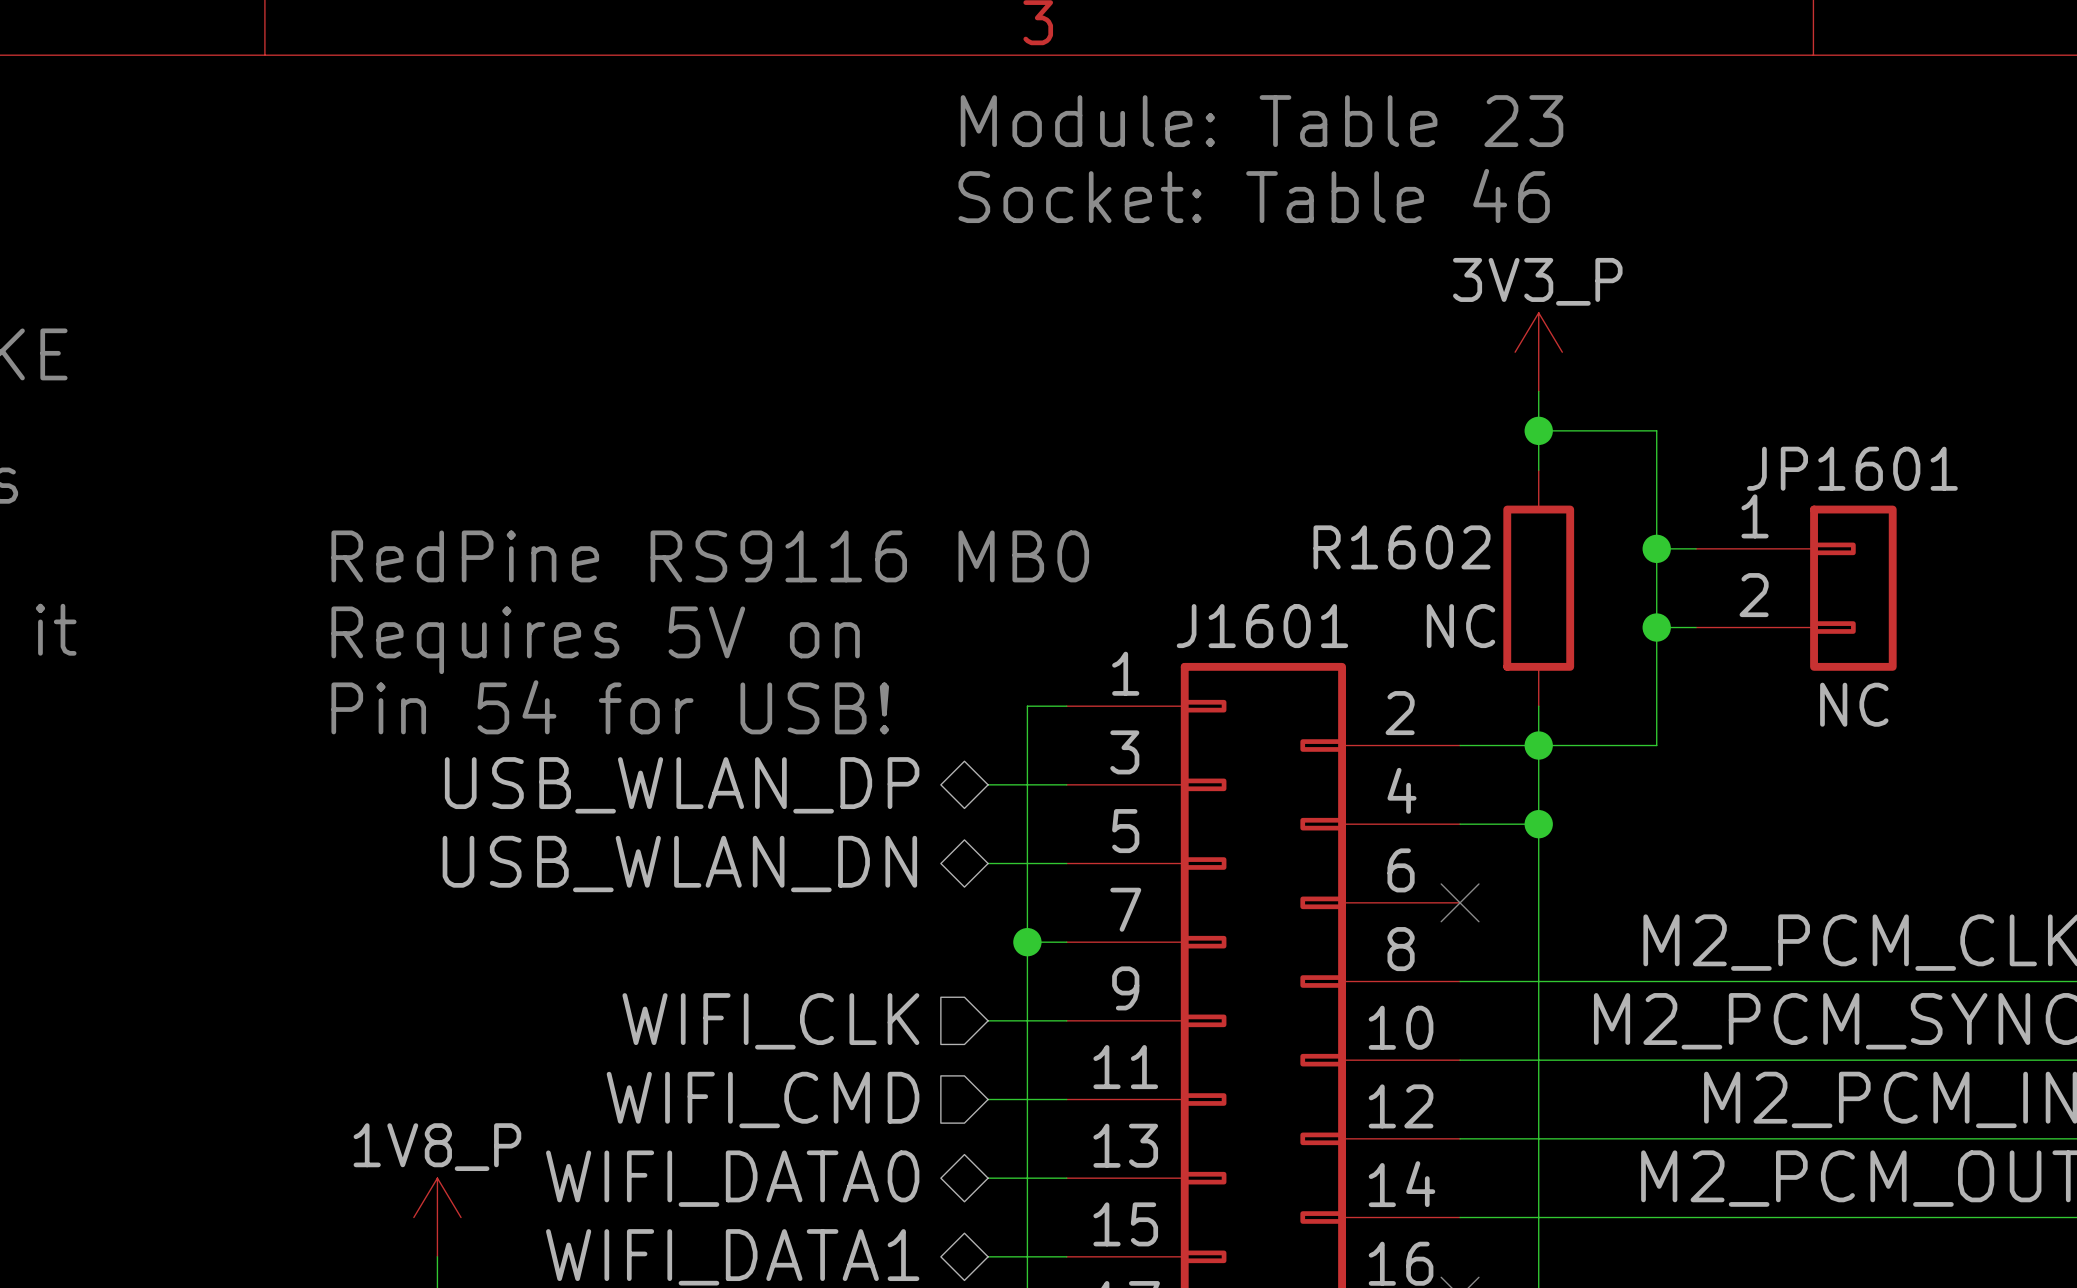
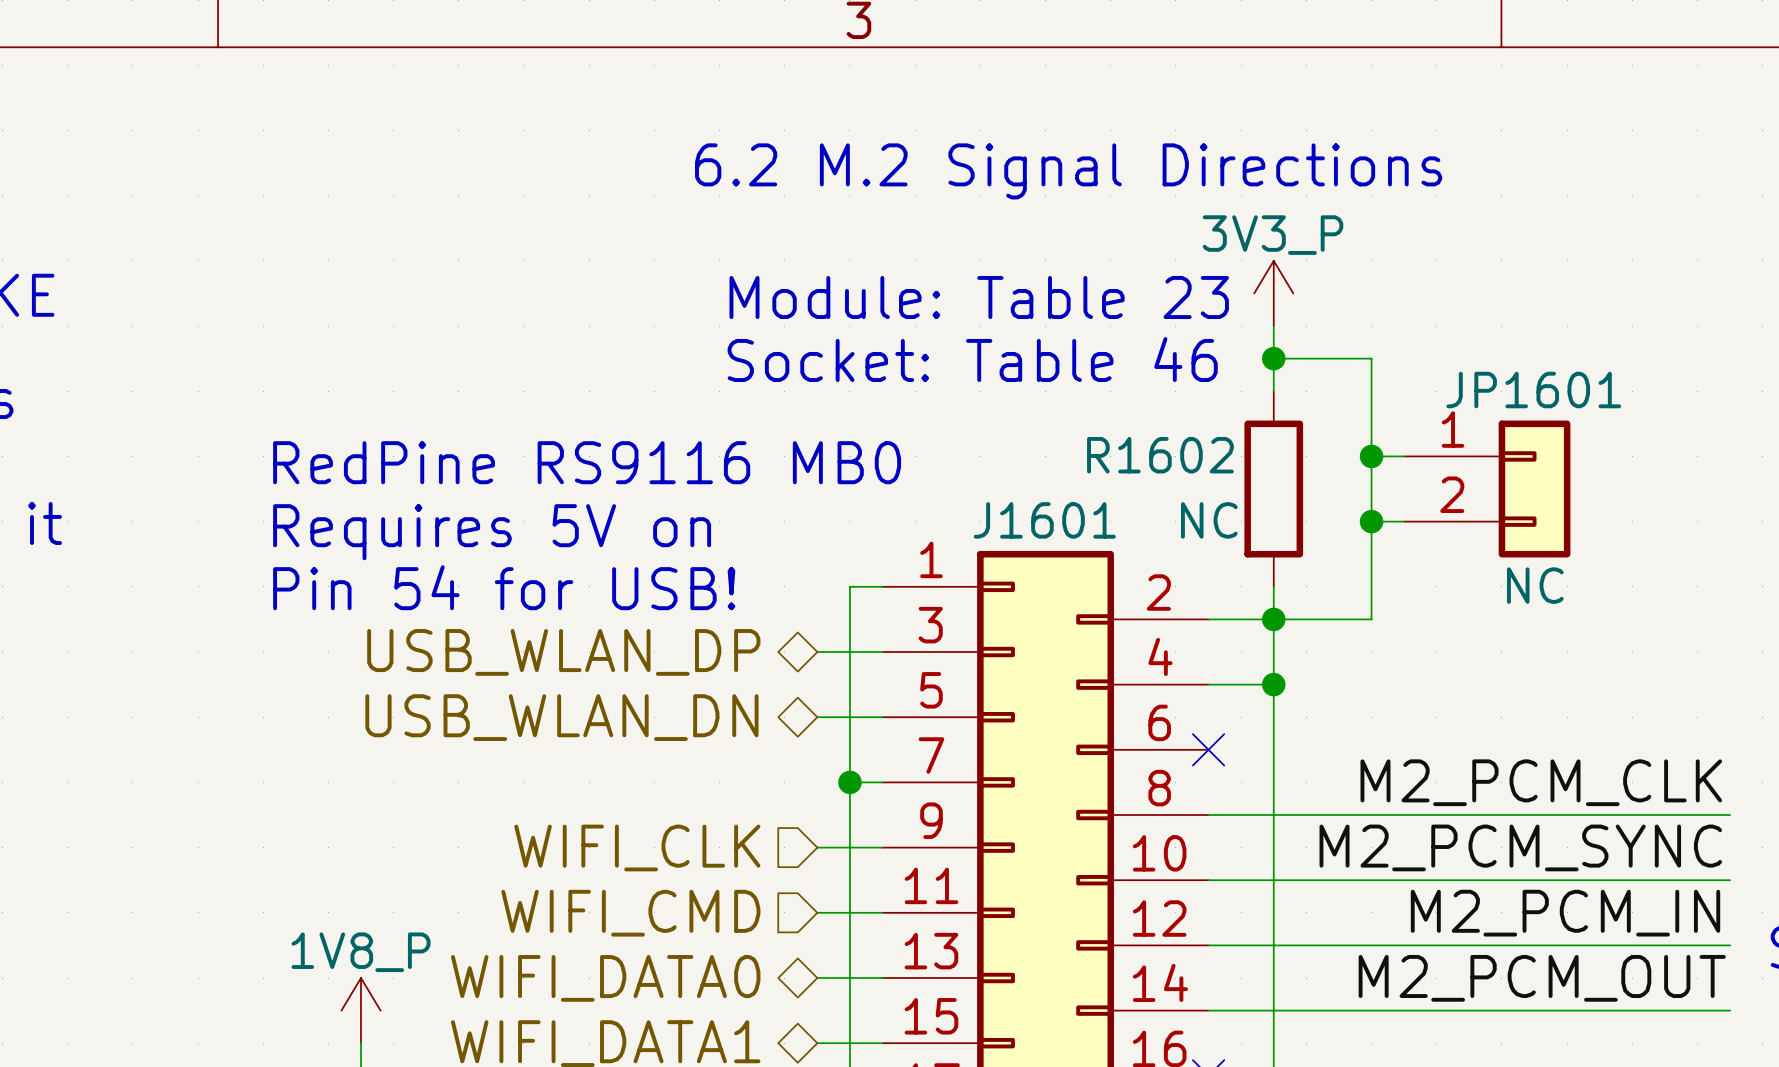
text position: Module: Table 23 (1262, 121) -> Module: Table 23 (979, 297)
text position: Socket: Table 46 (1254, 195) -> Socket: Table 46 (972, 359)
text: none -> 6.2 M.2 Signal Directions (1068, 171)

